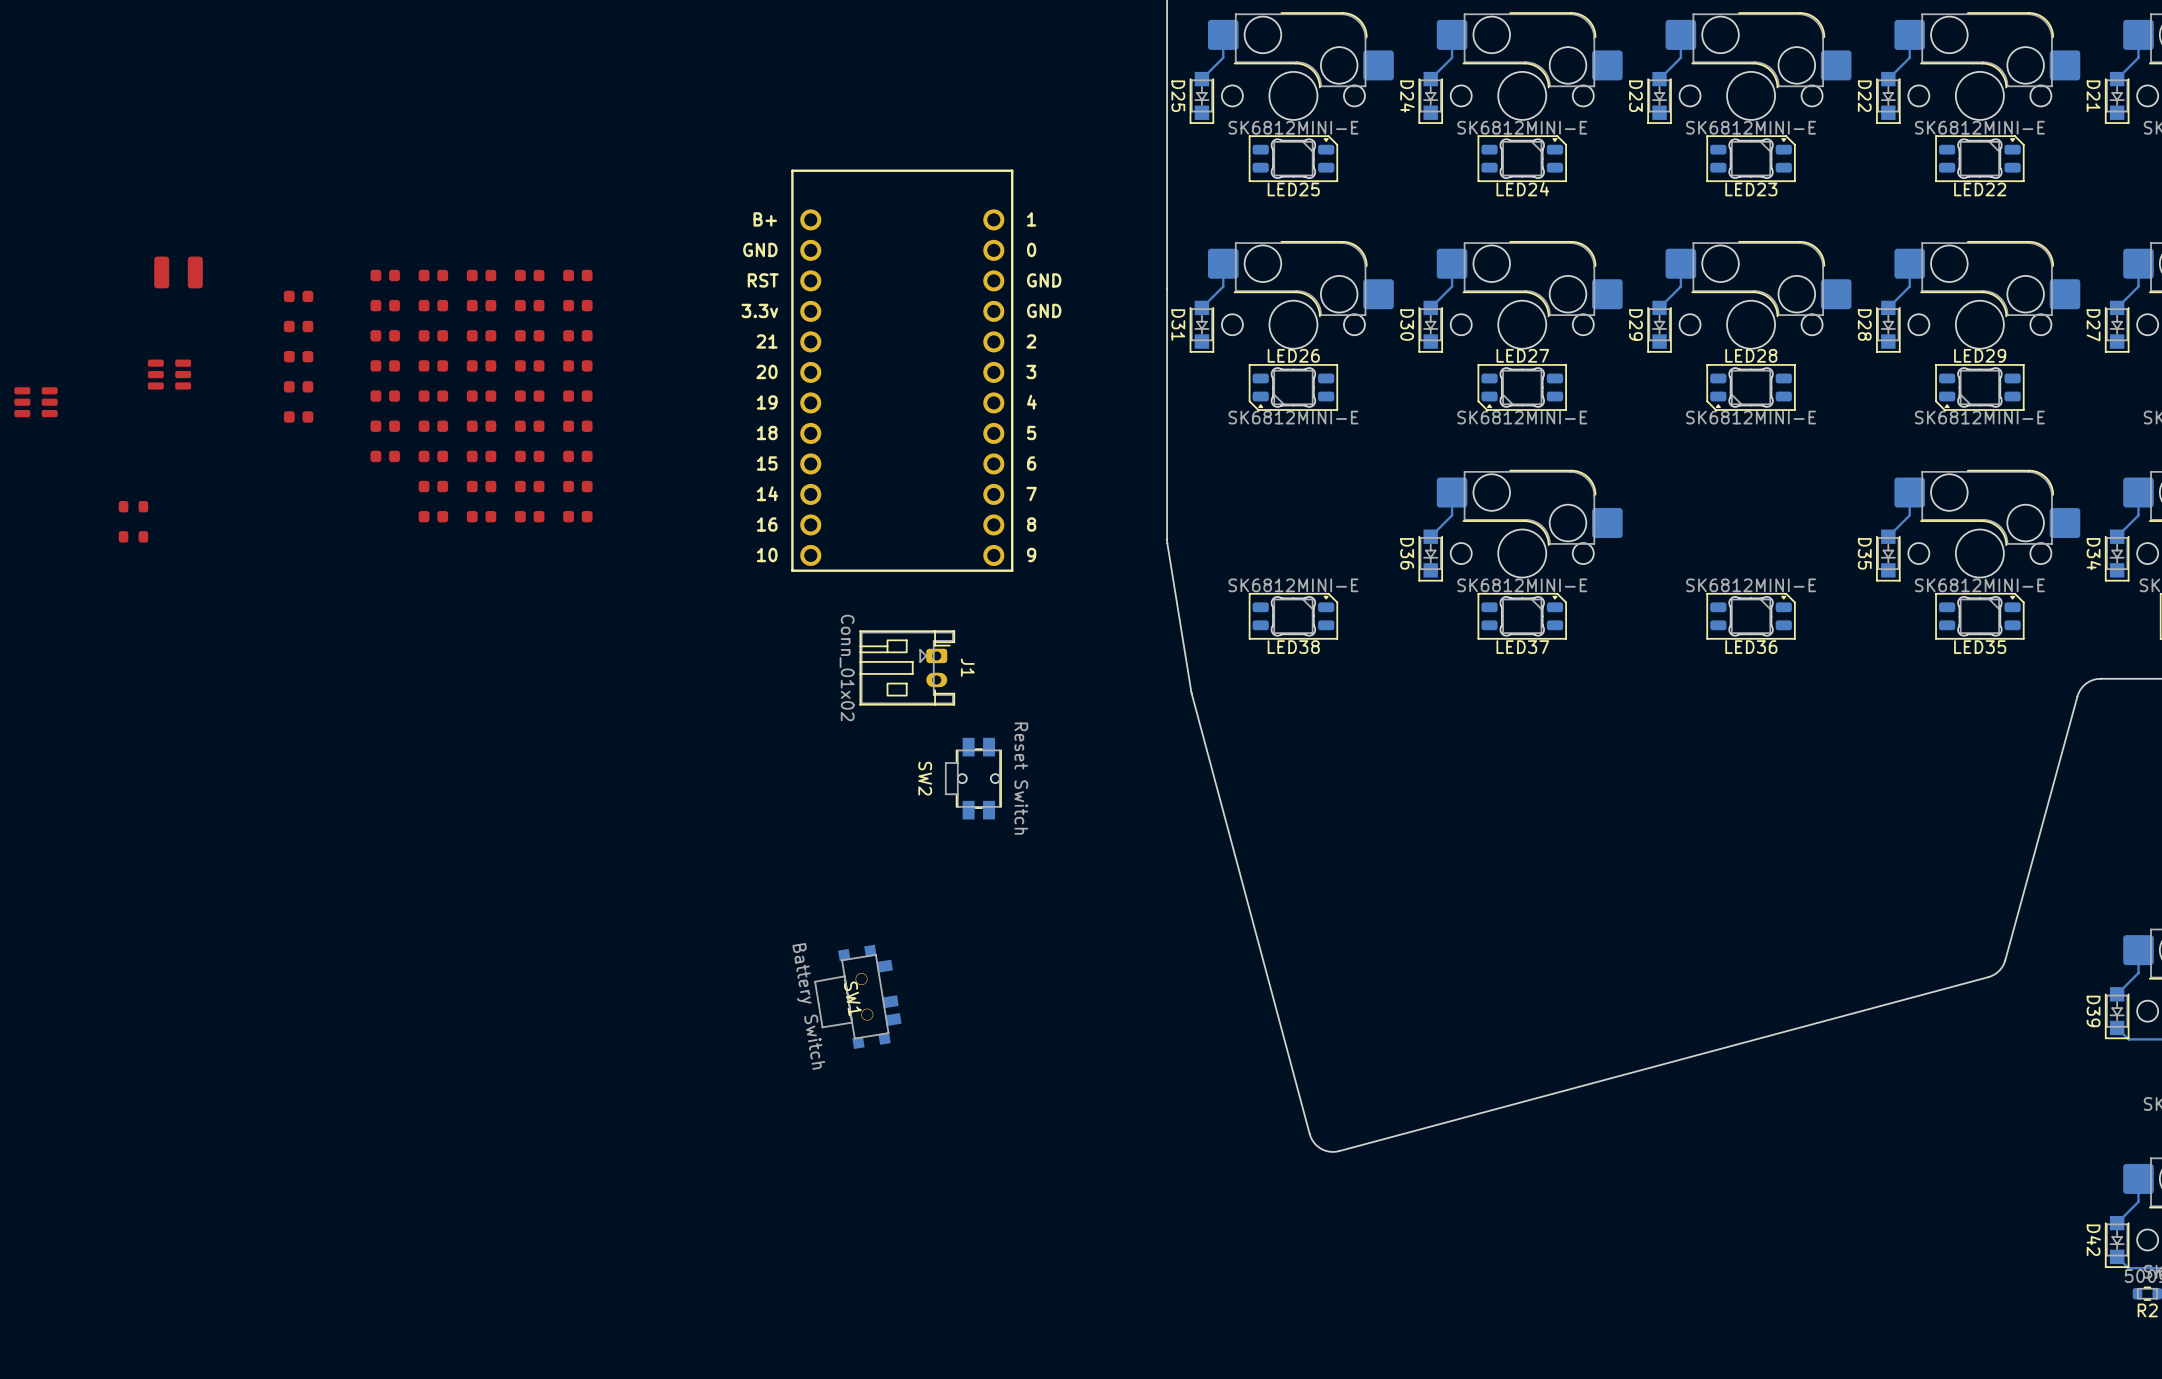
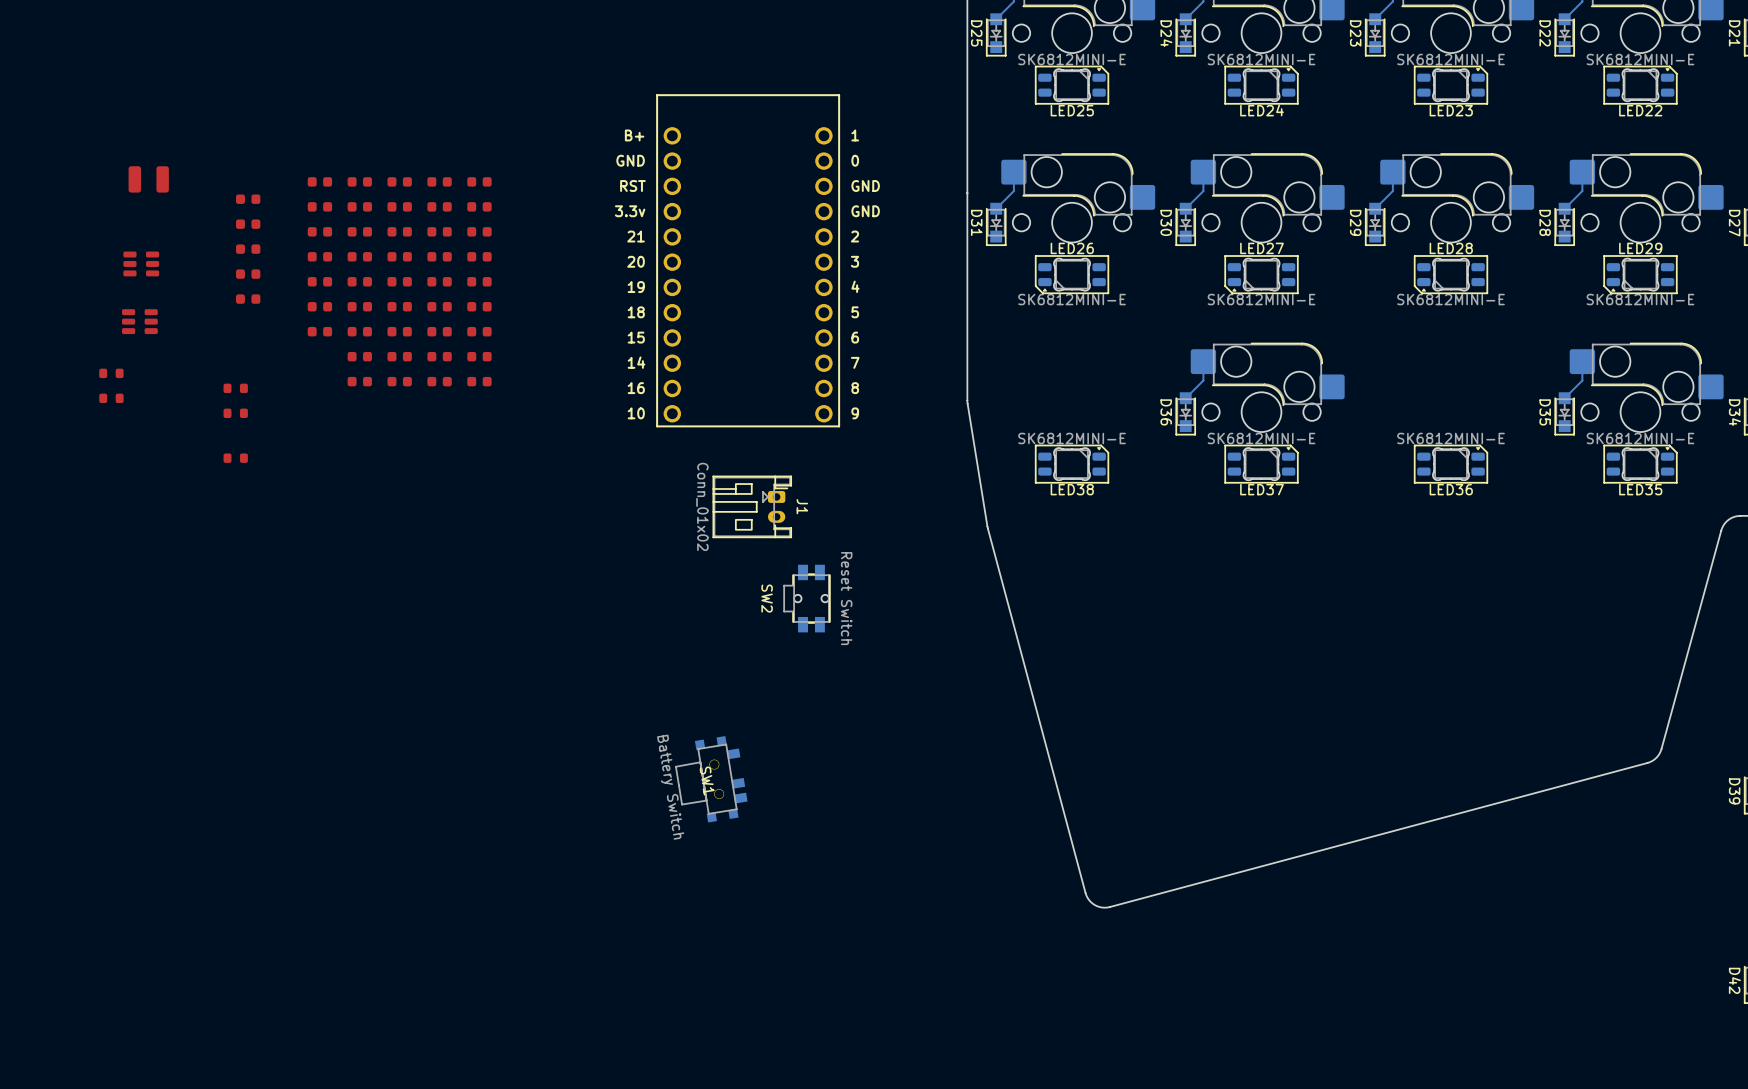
part position: (36, 402) -> (139, 321)
part: none -> (235, 388)
part: none -> (235, 413)
part: none -> (235, 458)

